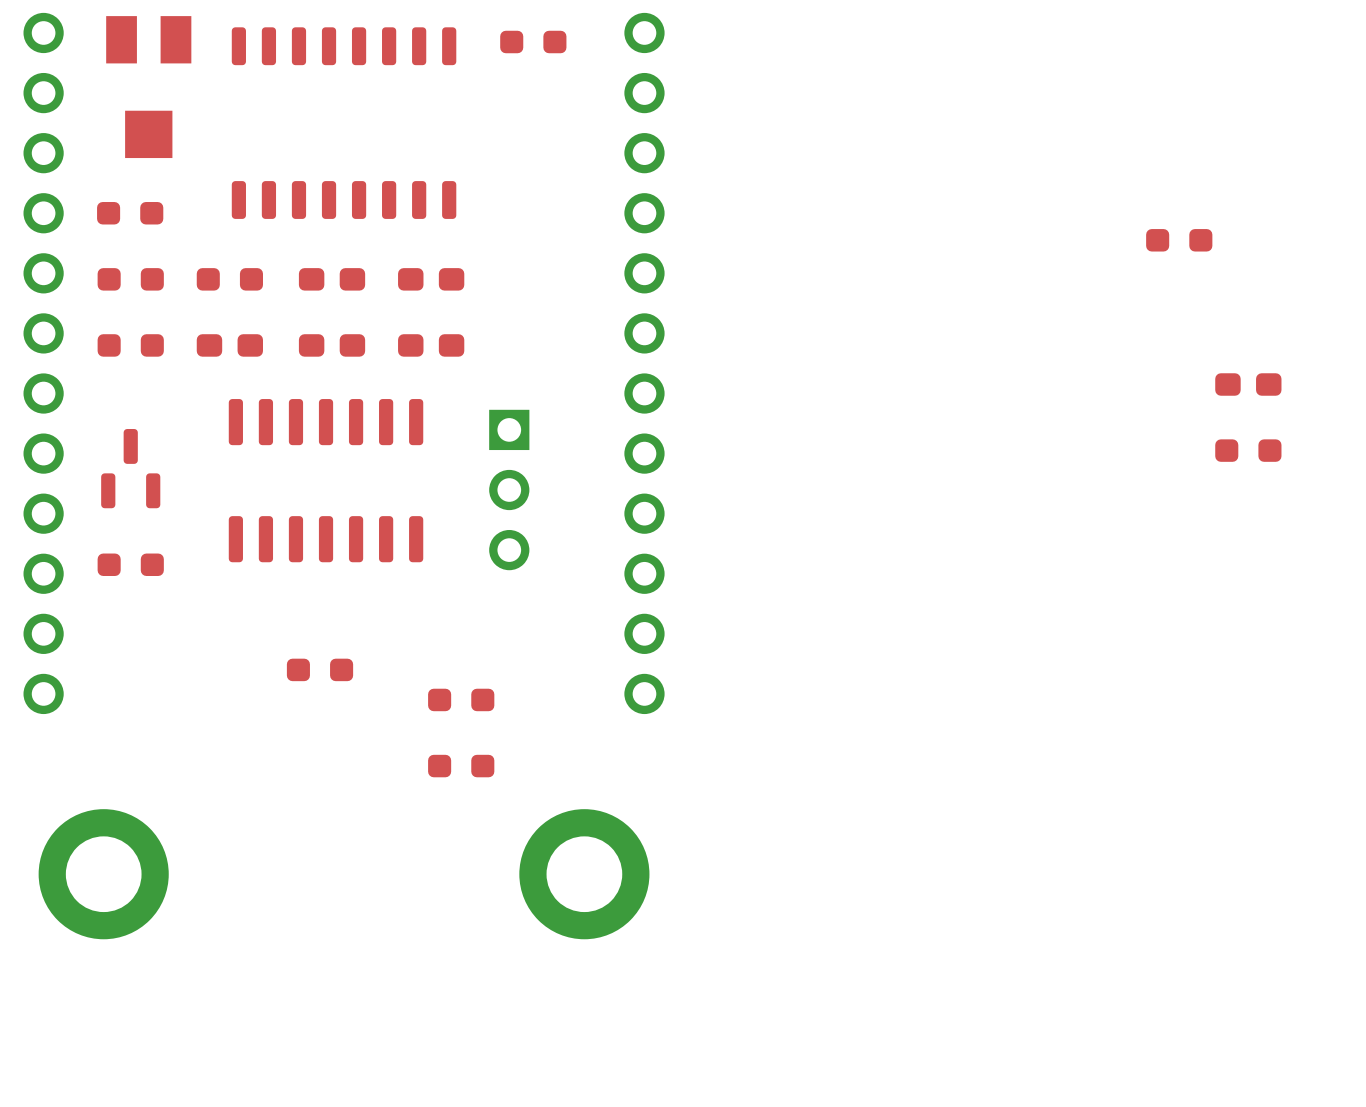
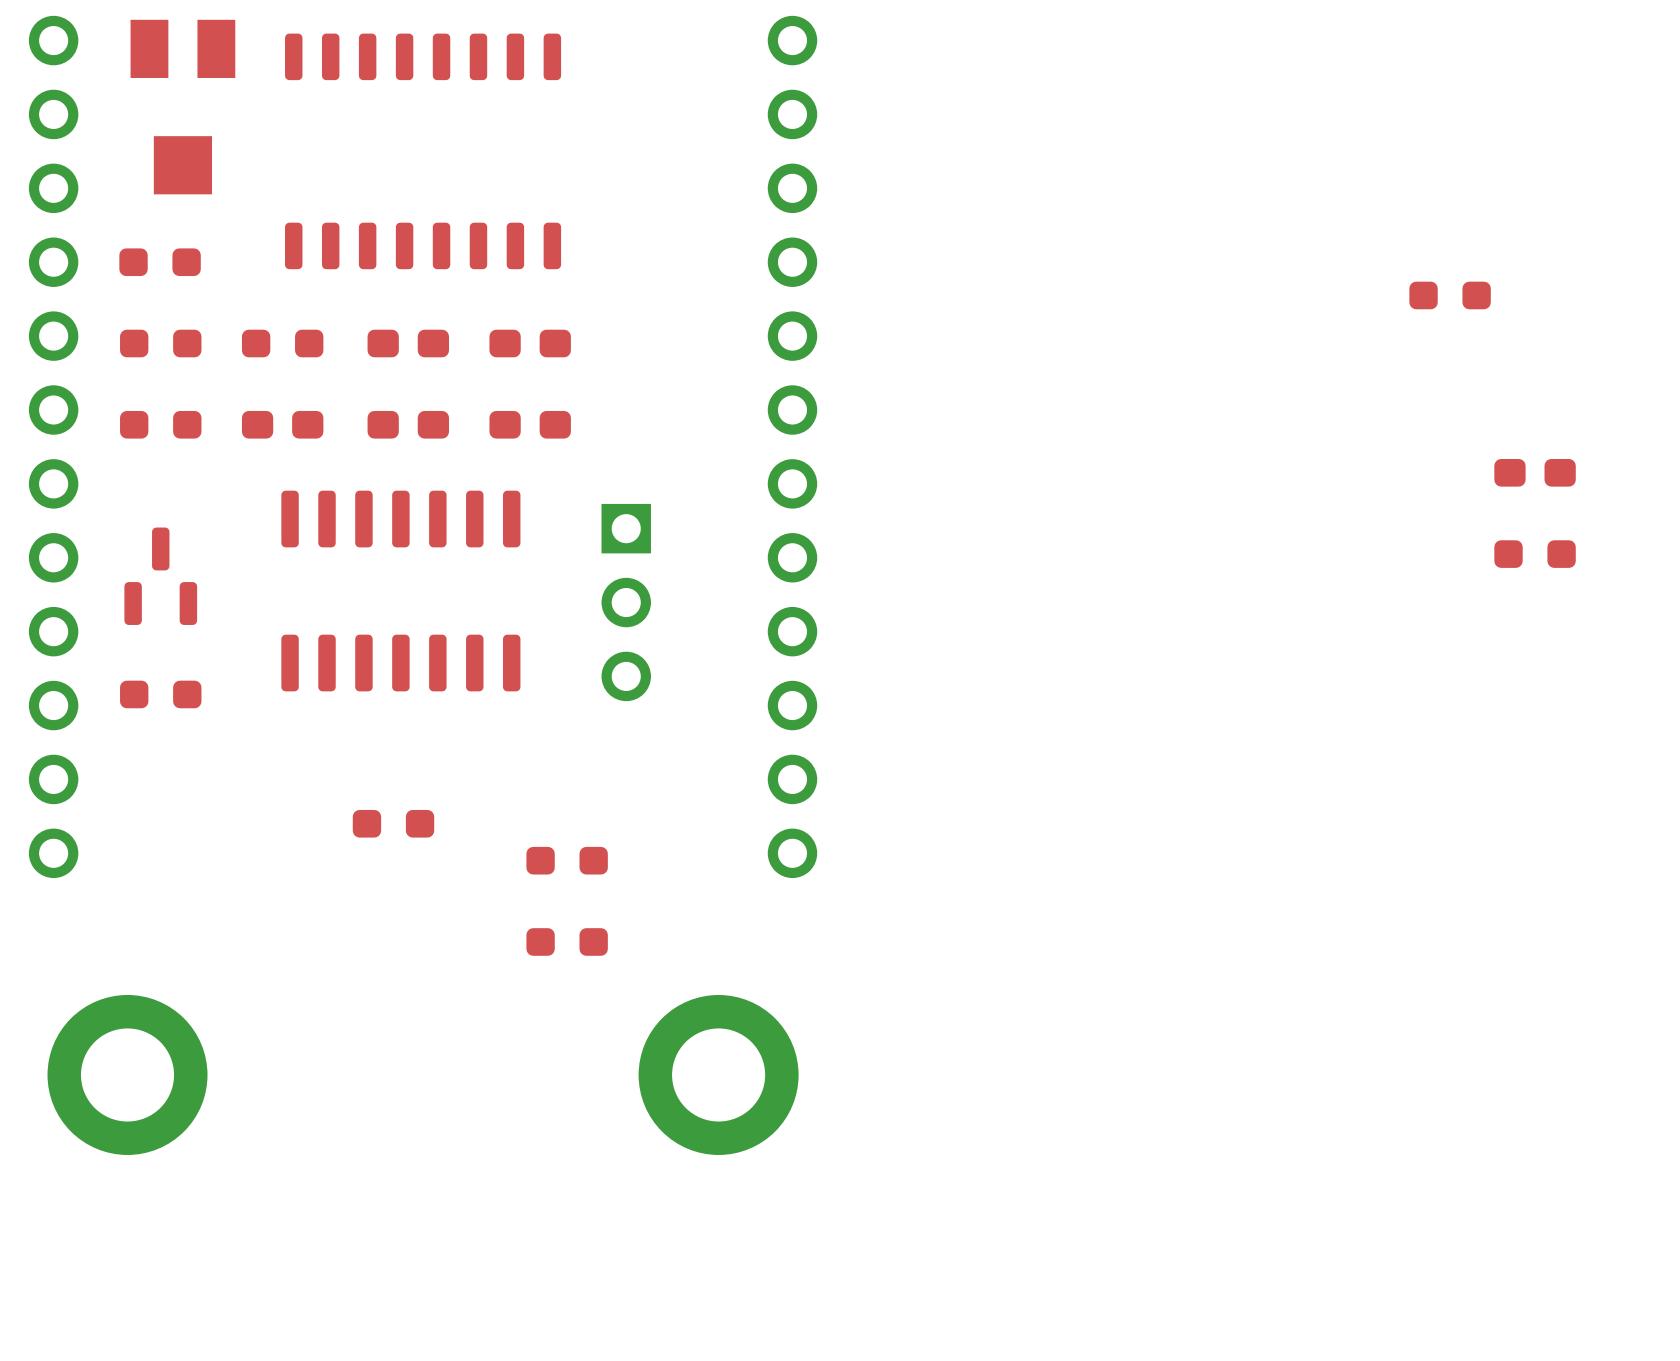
part: (533, 42) -> none

